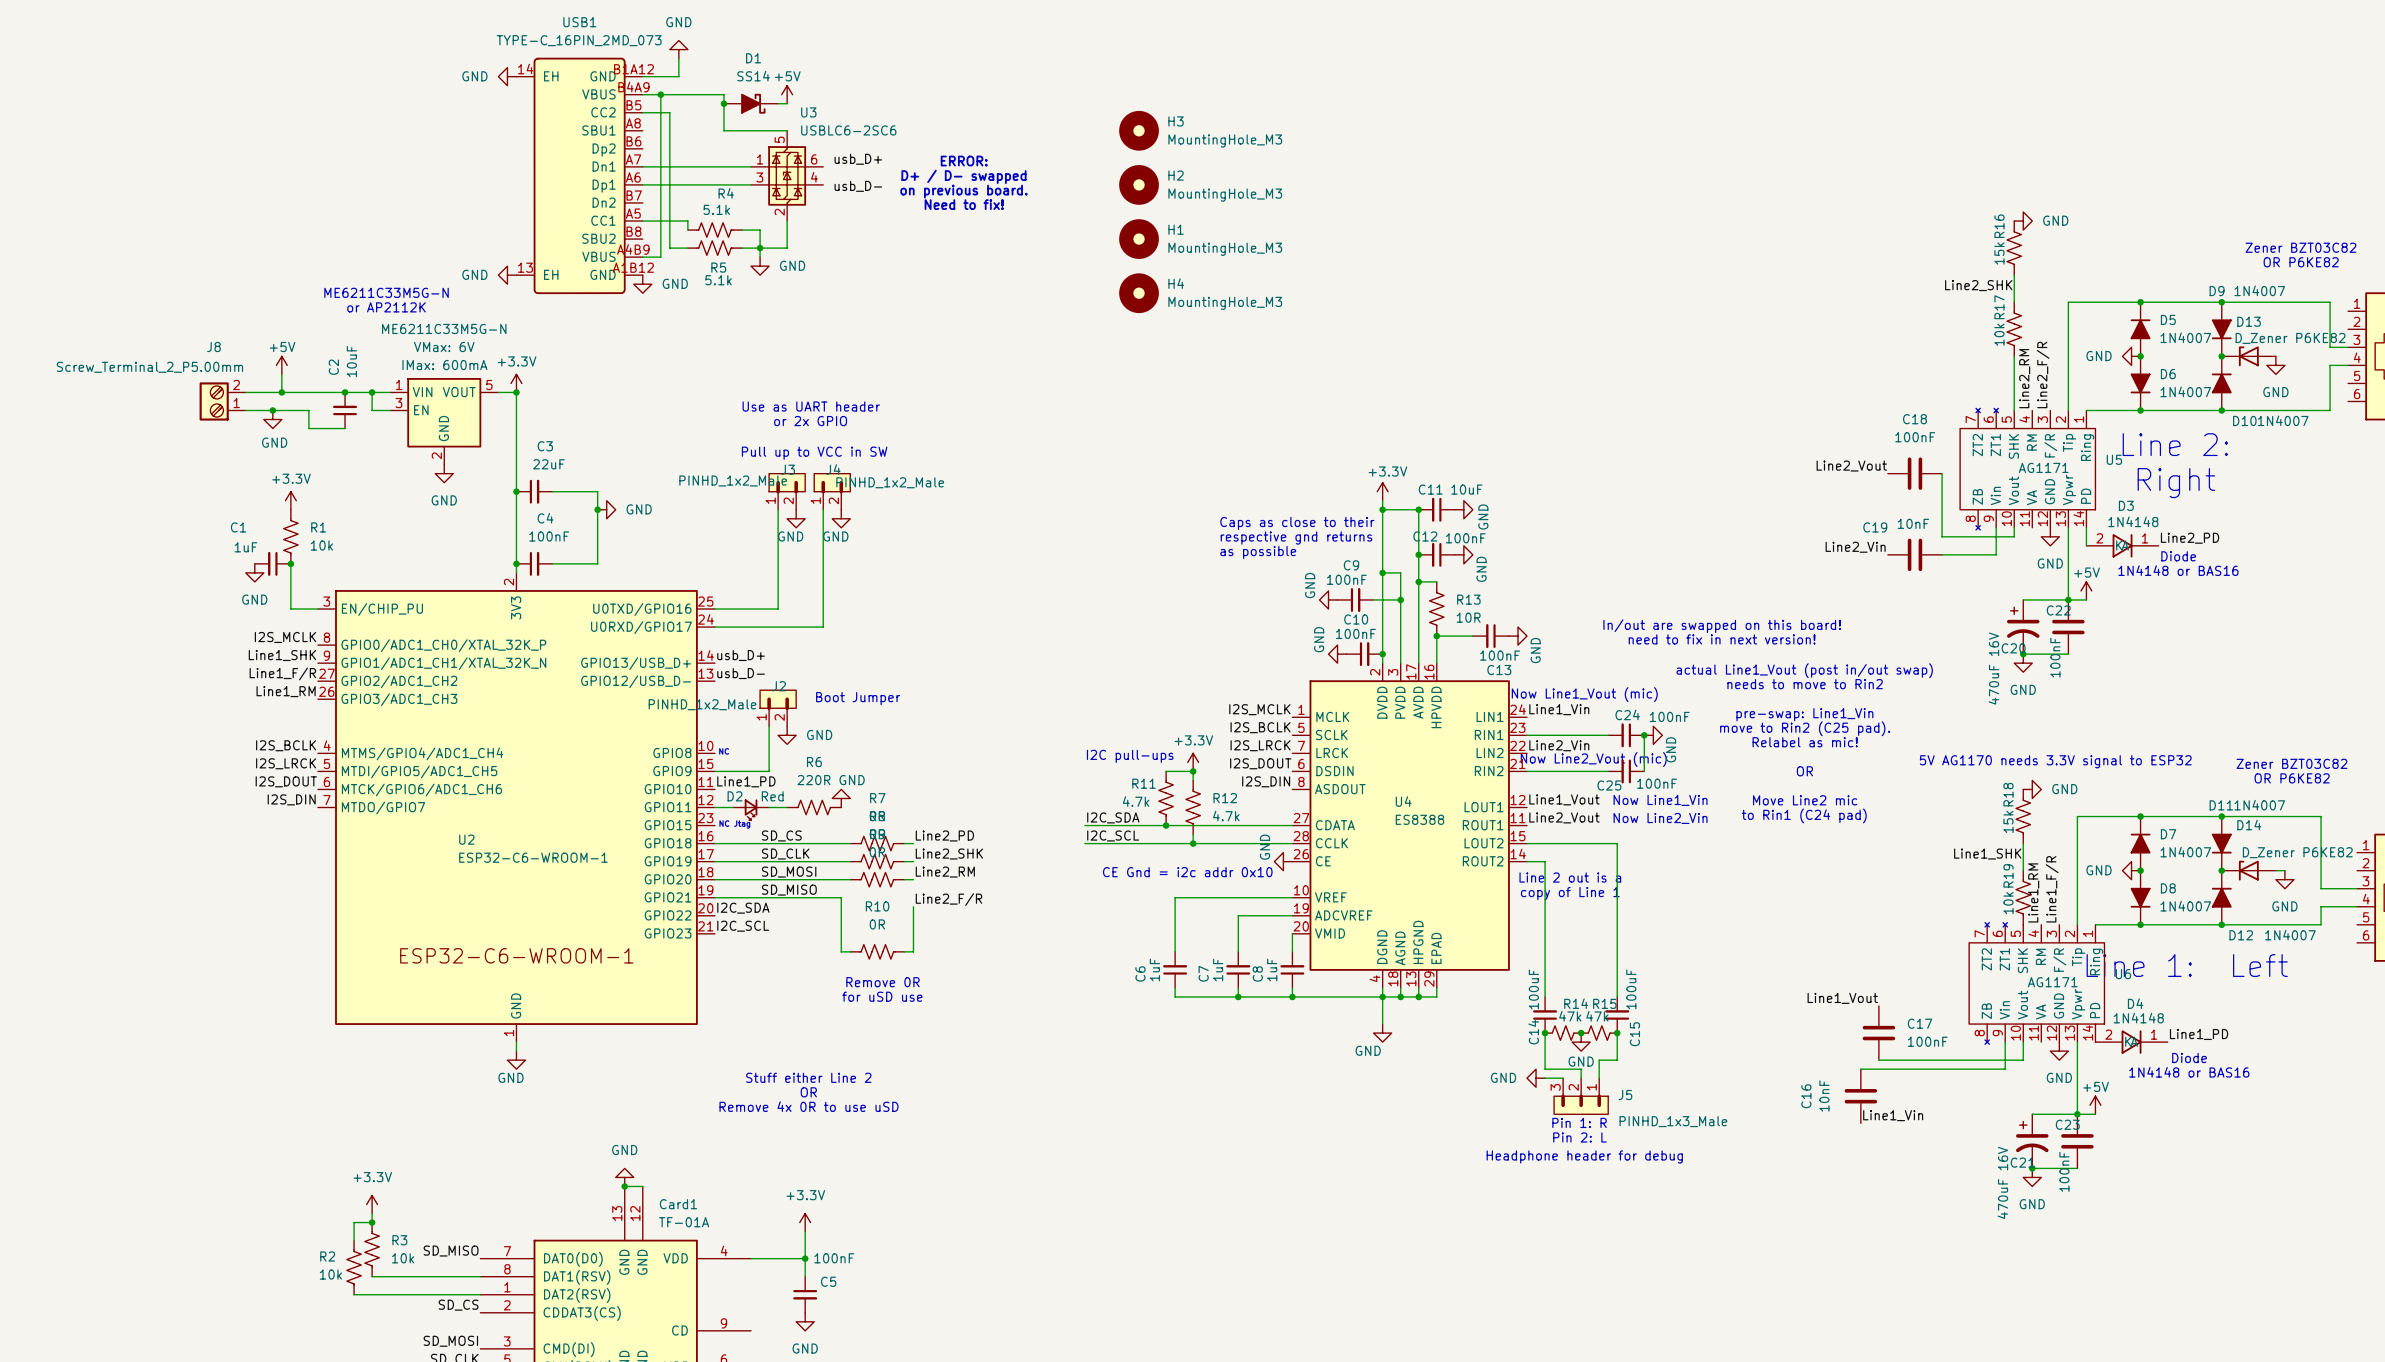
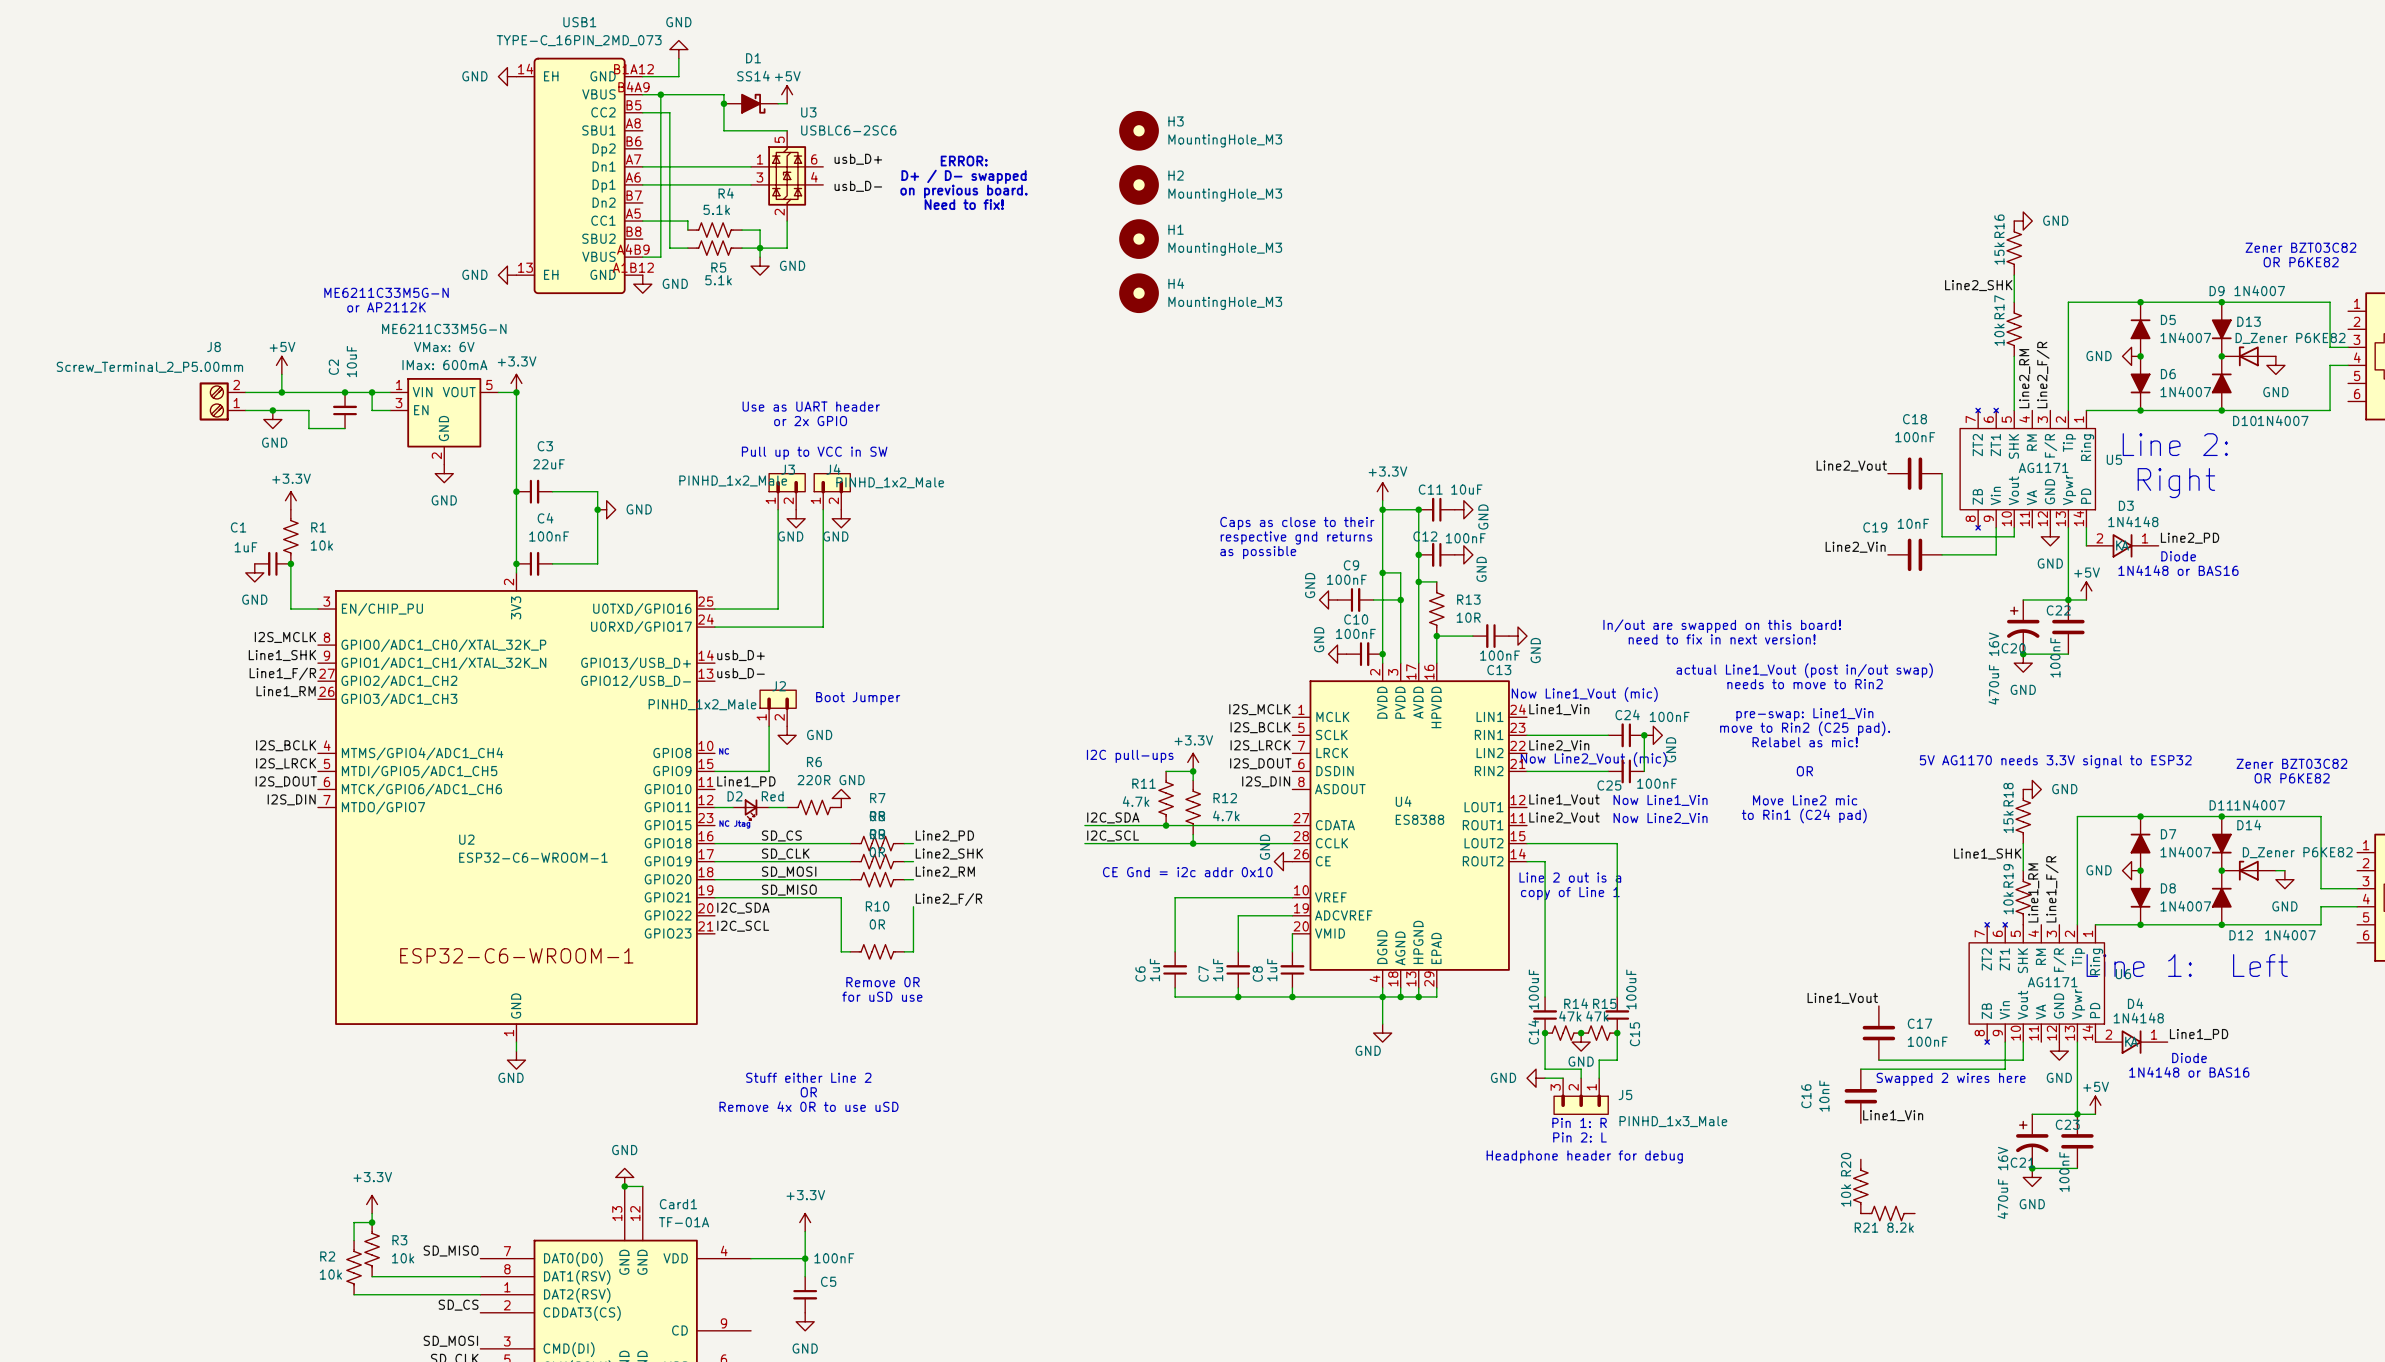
text: none -> Swapped 2 wires here (1951, 1079)
R20: none -> 10k (1860, 1186)
R21: none -> 8.2k (1887, 1213)

